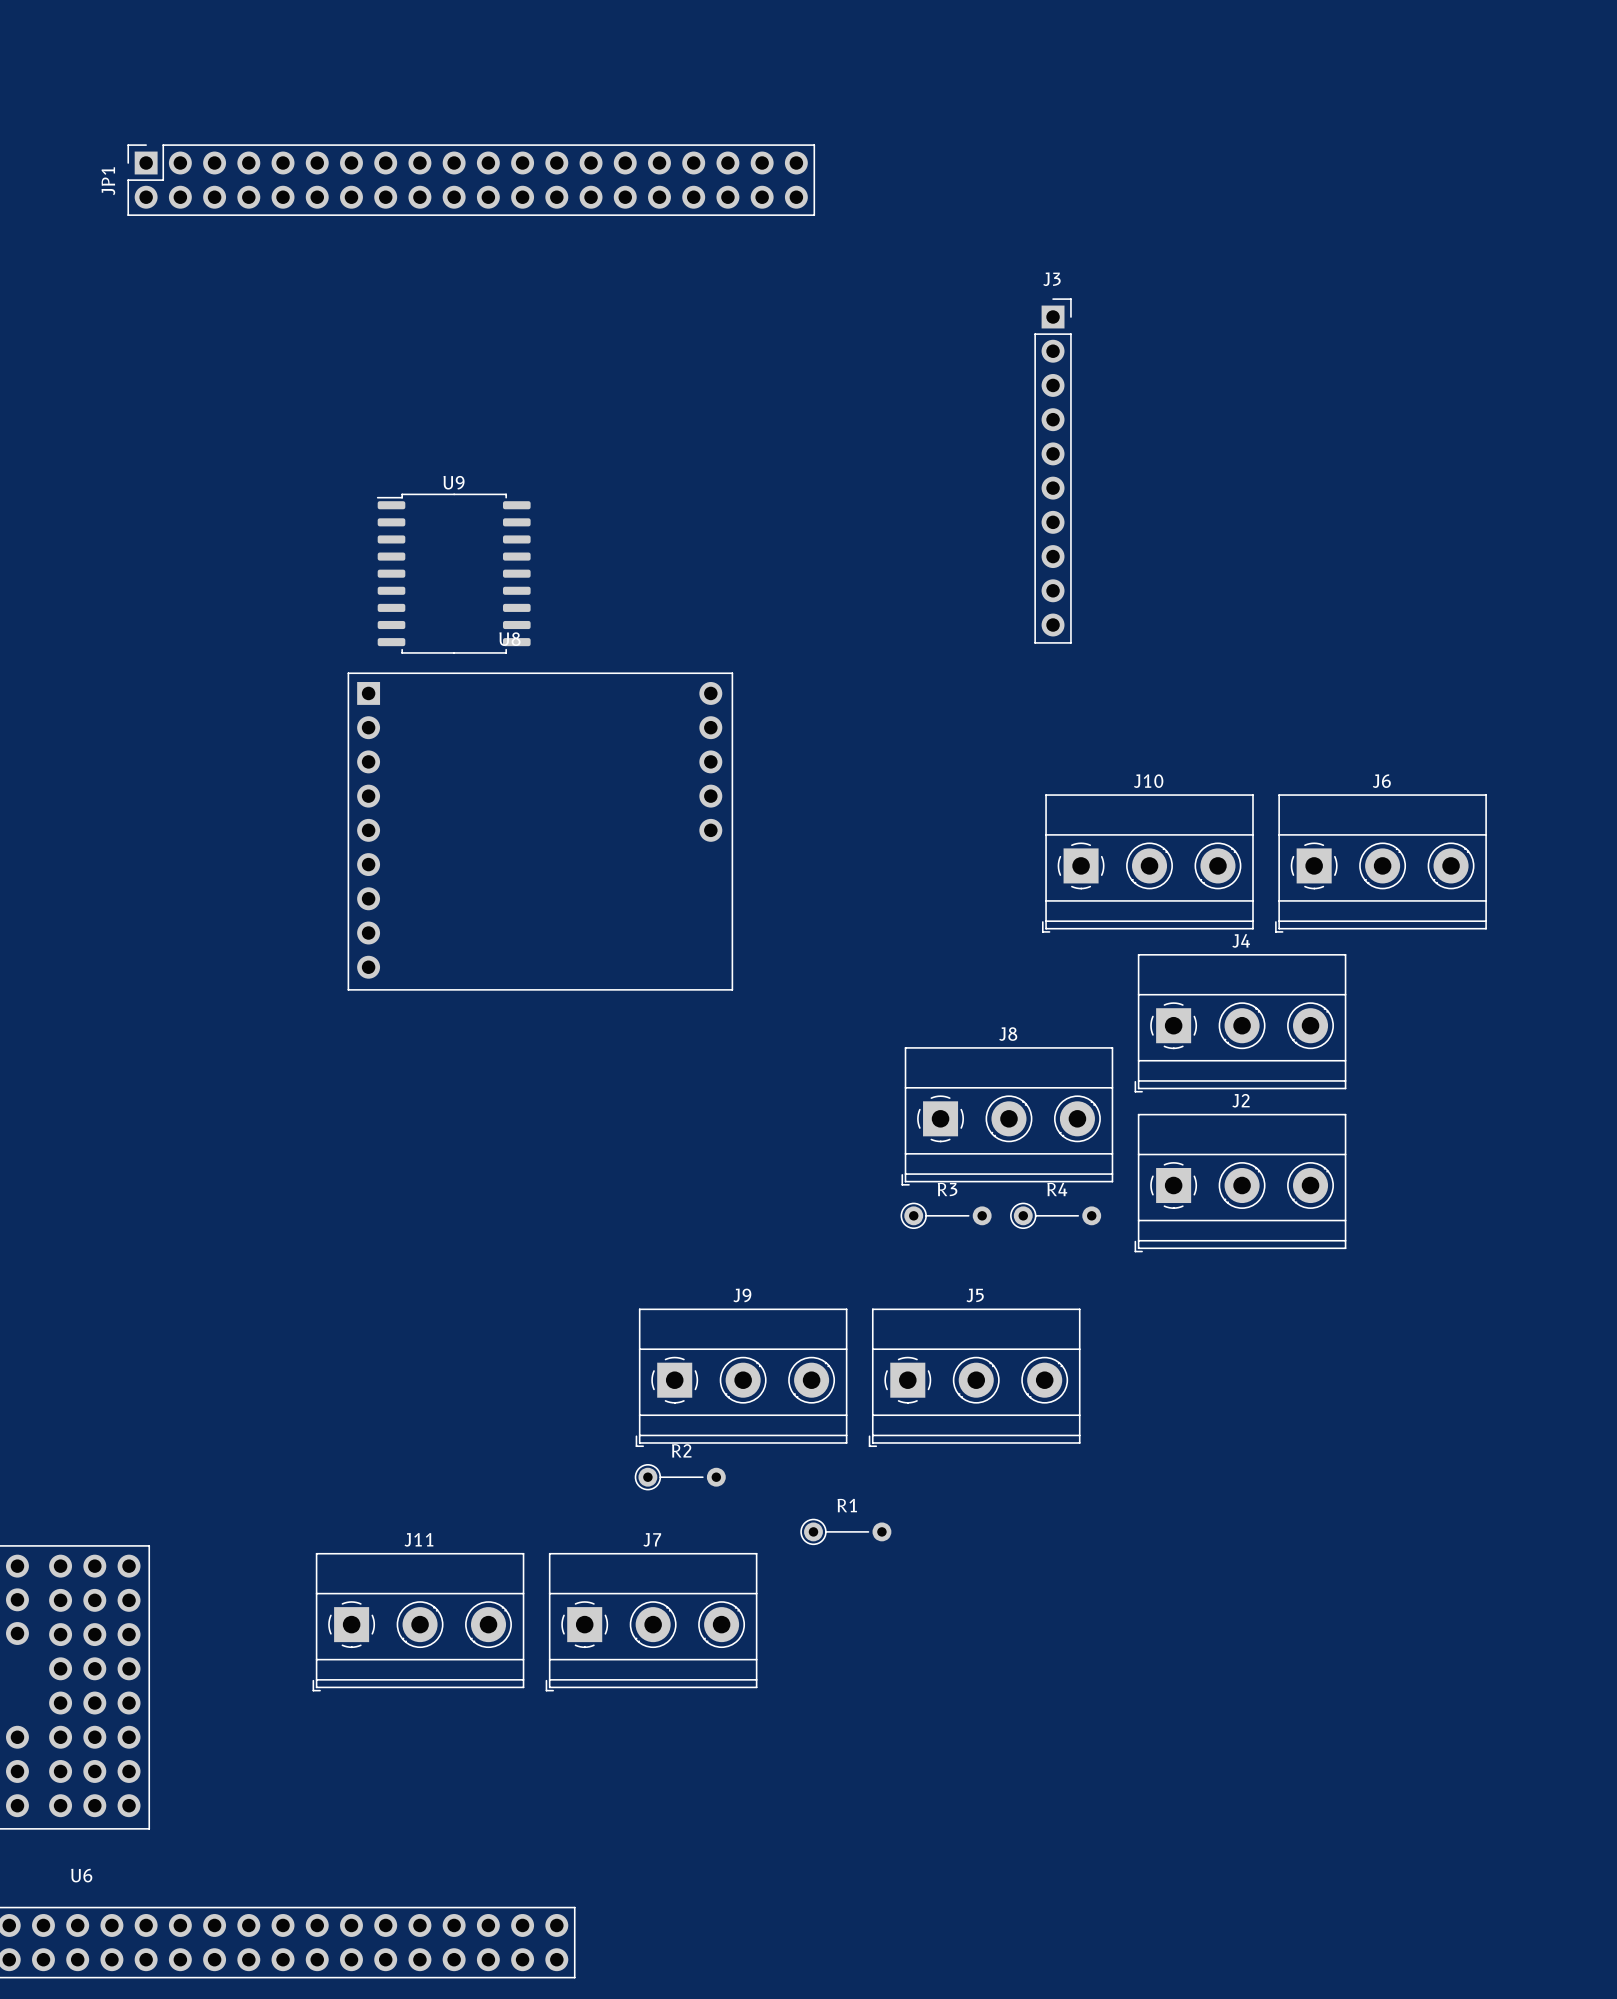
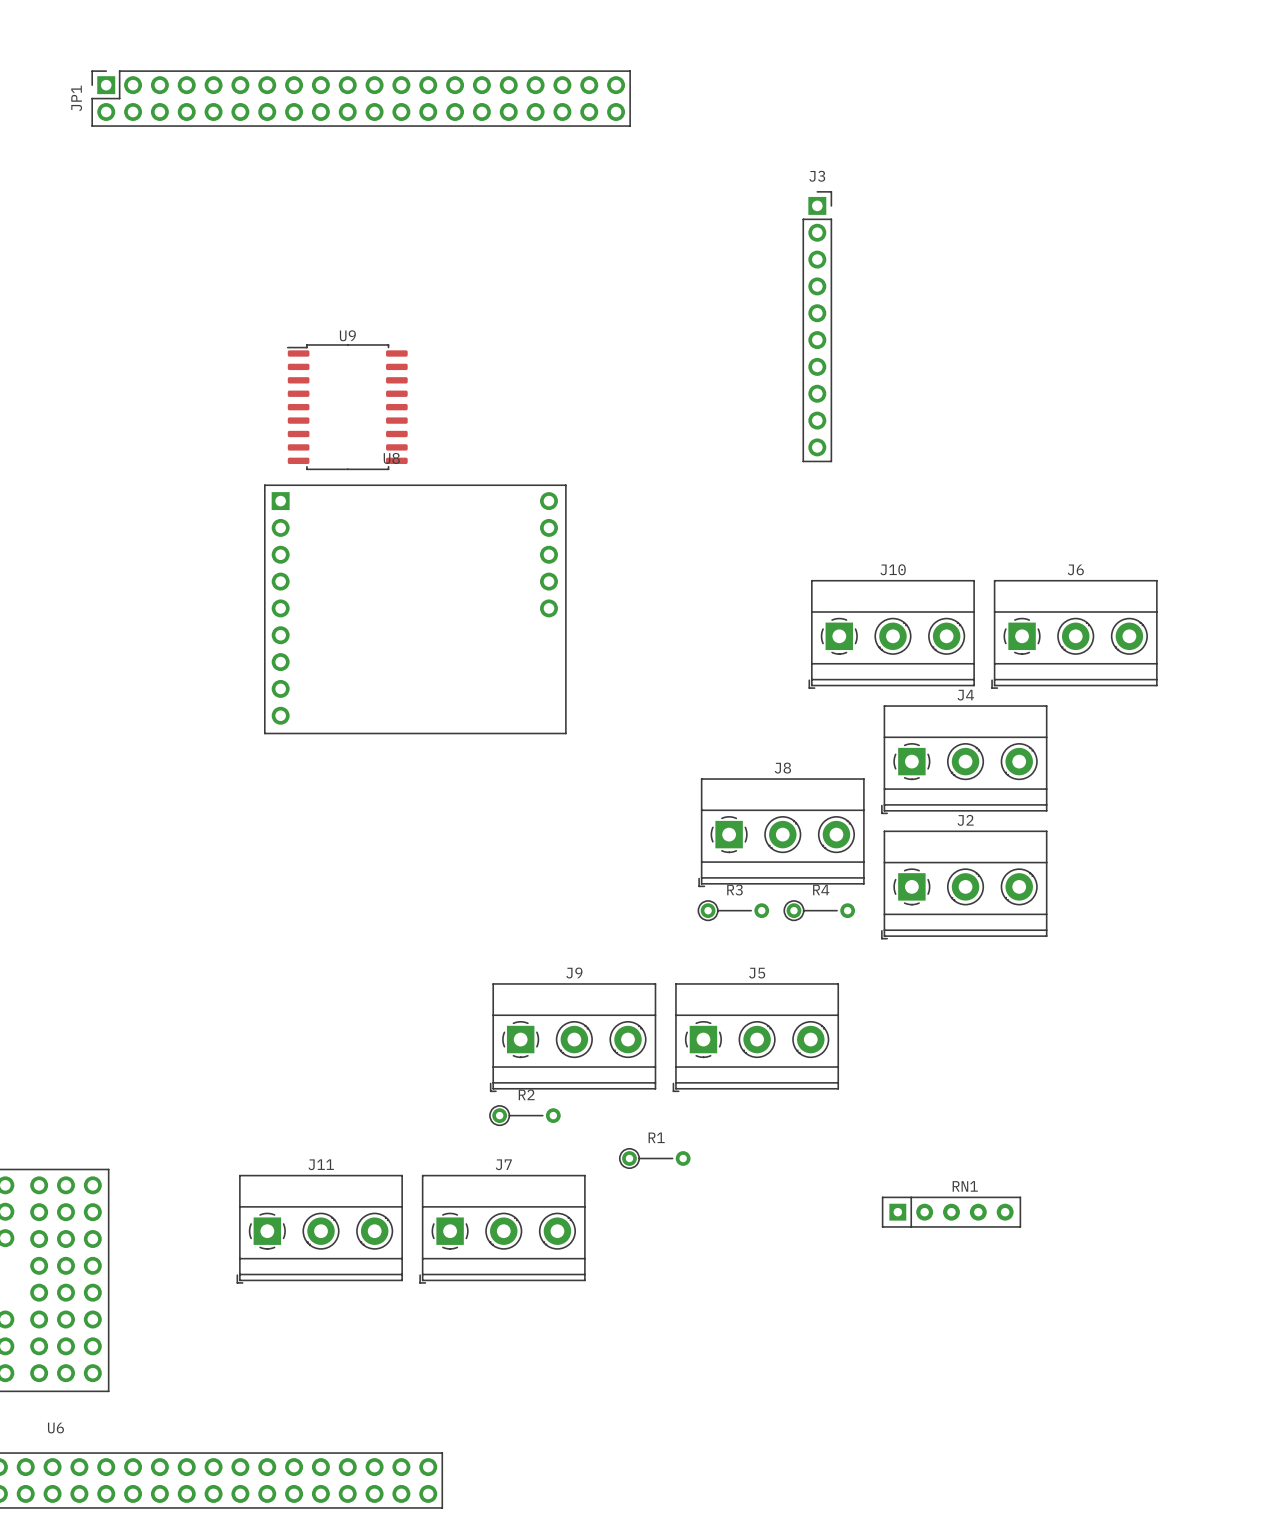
RN1: none -> (951, 1212)

